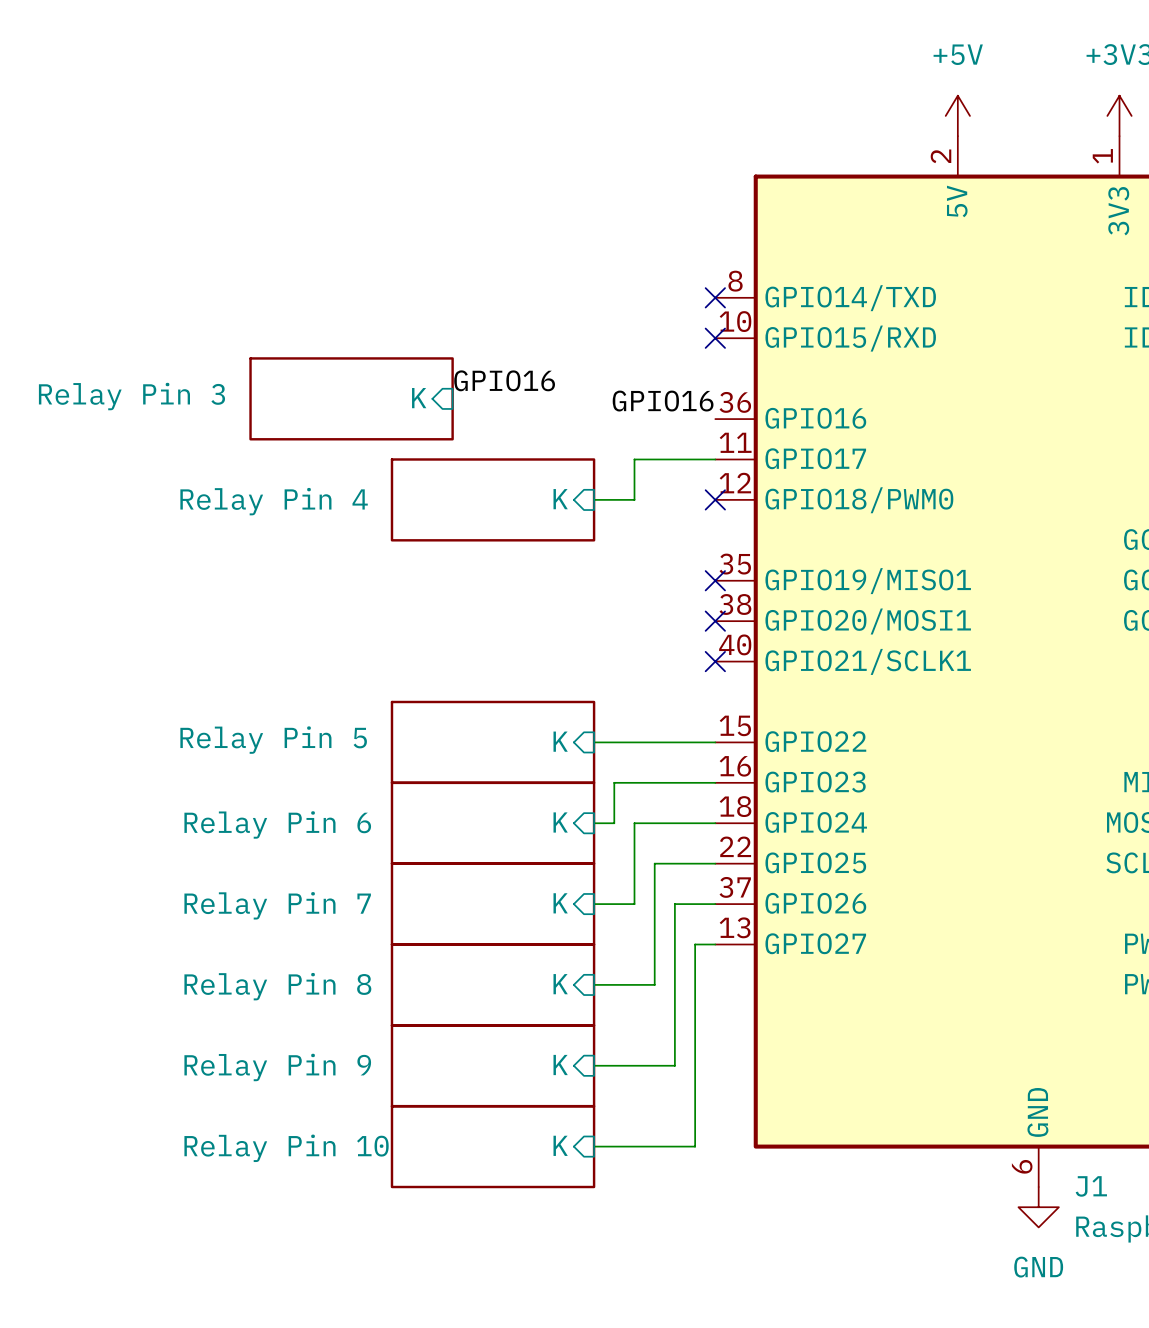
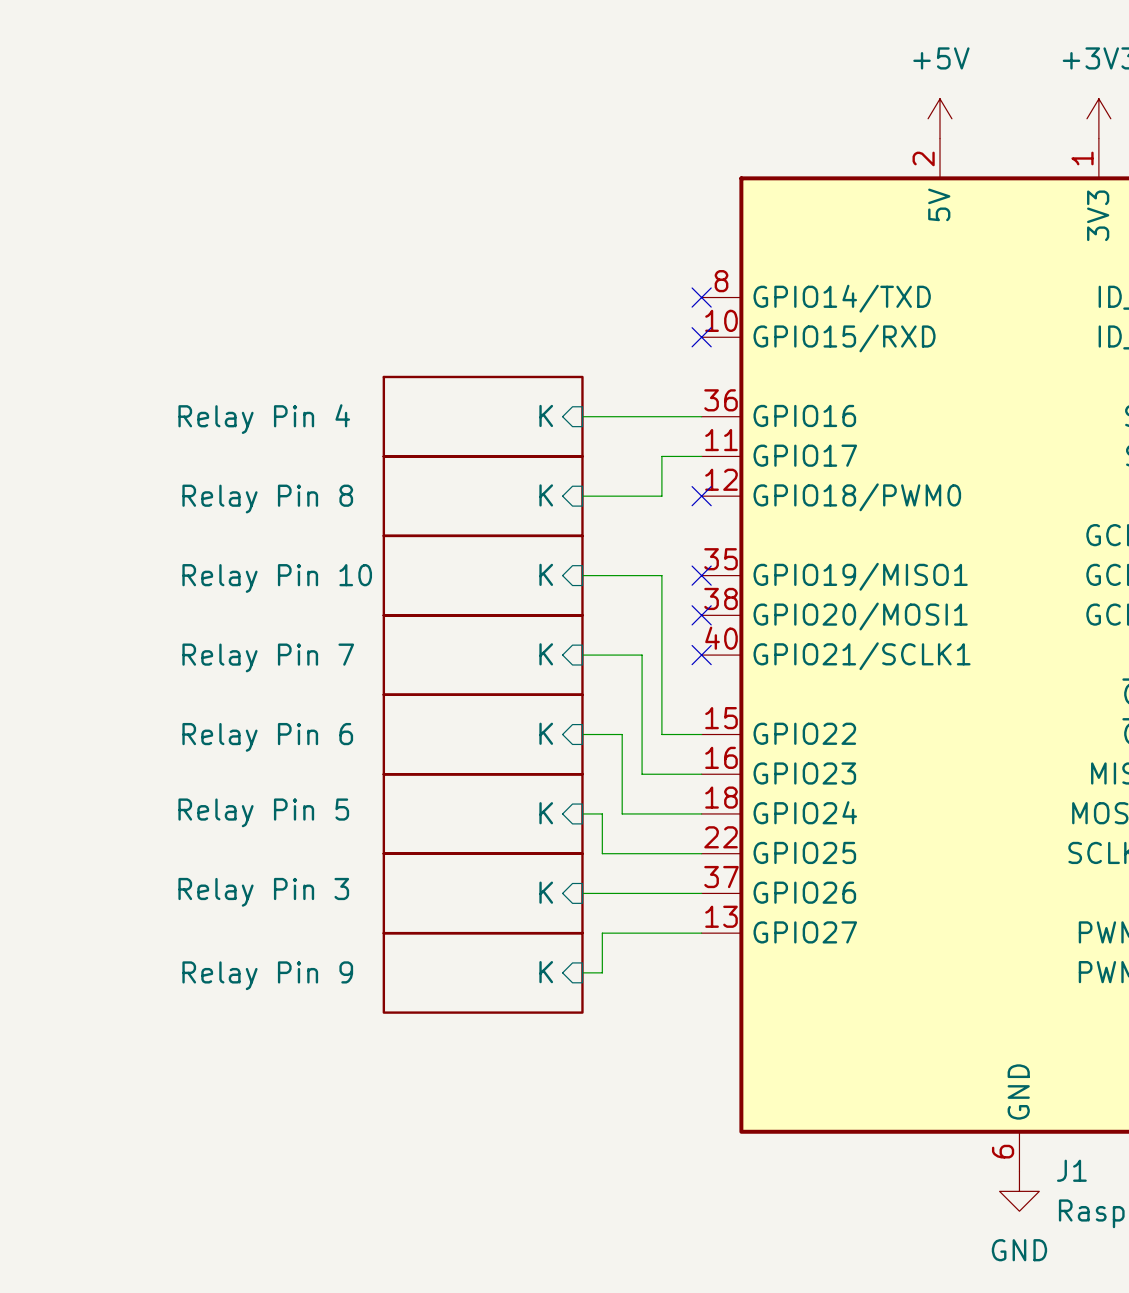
label: GPIO16 (504, 380) -> none
sheet Relay Pin 3: (351, 398) -> none
sheet pin: K (419, 398) -> none
label: GPIO16 (663, 401) -> none
sheet pin: none -> K (546, 415)
sheet Relay Pin 4: none -> (483, 416)
wire: none -> (582, 416) (701, 416)
wire: (674, 459) (634, 459) (634, 499) -> (661, 456) (661, 496) (622, 496)
sheet Relay Pin 4 name: Relay Pin 4 (274, 501) -> Relay Pin 8 (267, 499)
sheet pin: none -> K (546, 574)
wire: none -> (582, 575) (661, 575) (661, 734)
sheet pin: none -> K (546, 654)
sheet Relay Pin 7: none -> (483, 655)
wire: none -> (582, 655) (642, 655) (642, 774)
sheet Relay Pin 5 name: Relay Pin 5 (273, 740) -> Relay Pin 6 (267, 737)
wire: (634, 742) (674, 742) -> (622, 734) (622, 813)
wire: (654, 782) (614, 782) (614, 823) -> (642, 853) (602, 853) (602, 813)
wire: (634, 823) (634, 904) -> (661, 893) (622, 893)
sheet Relay Pin 6 name: Relay Pin 6 (277, 824) -> Relay Pin 5 (263, 812)
wire: (654, 863) (654, 984) (614, 984) -> (681, 933) (602, 933) (602, 972)
wire: (674, 904) (674, 1065) (594, 1065) -> none
sheet Relay Pin 7 name: Relay Pin 7 (277, 905) -> Relay Pin 3 (263, 892)
wire: (695, 944) (695, 1146) (594, 1146) -> none
sheet Relay Pin 8 name: Relay Pin 8 (277, 986) -> Relay Pin 9 (267, 975)
sheet Relay Pin 9: (493, 1065) -> none
sheet pin: K (560, 1065) -> none
sheet pin: K (560, 1145) -> none
sheet Relay Pin 10 position: (493, 1146) -> (483, 575)

